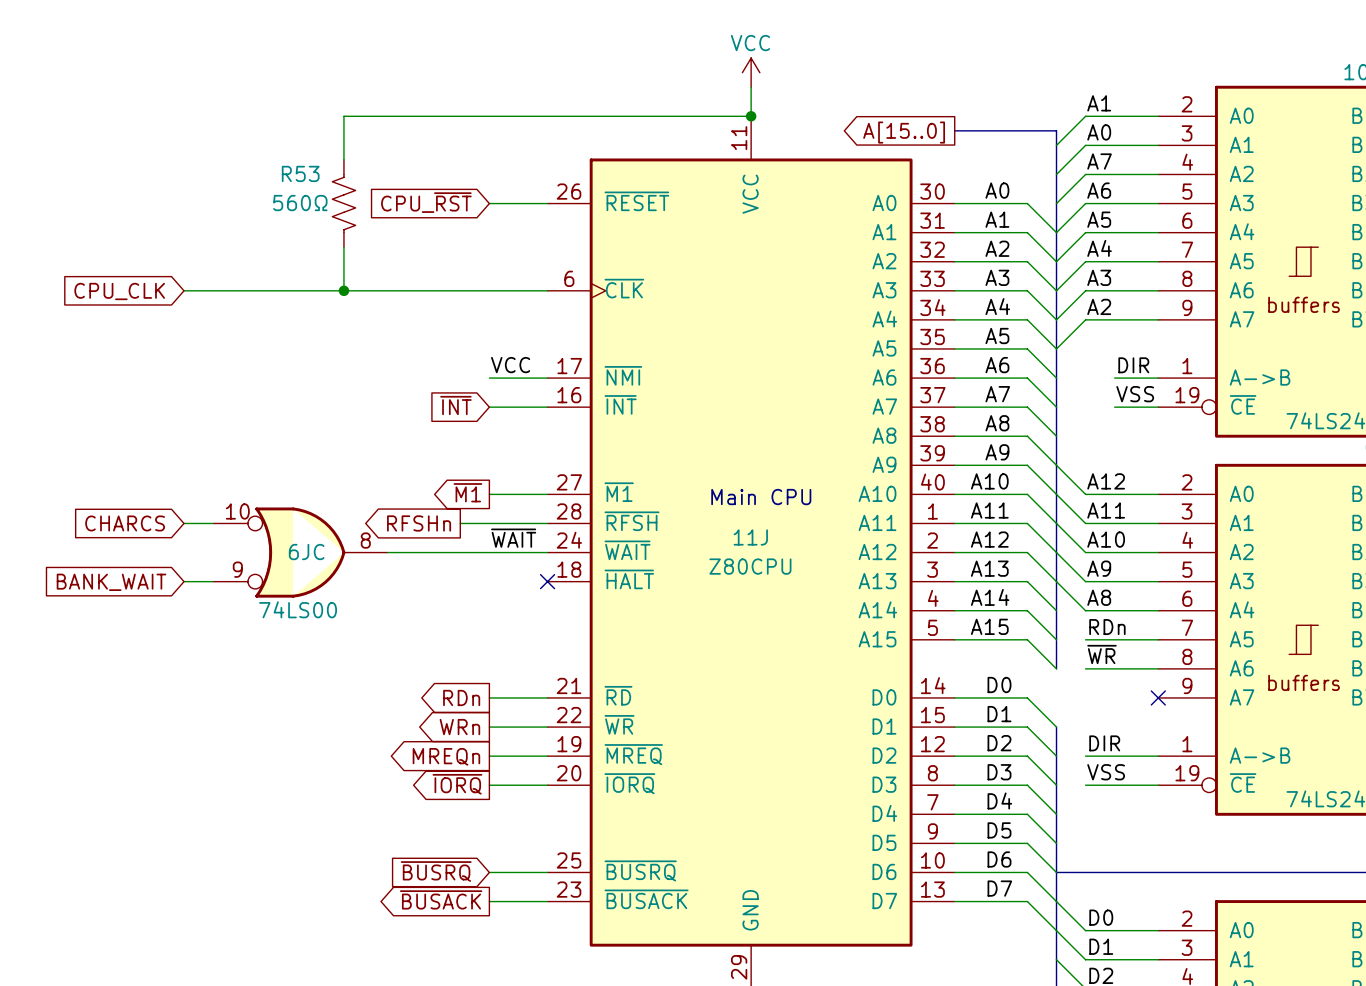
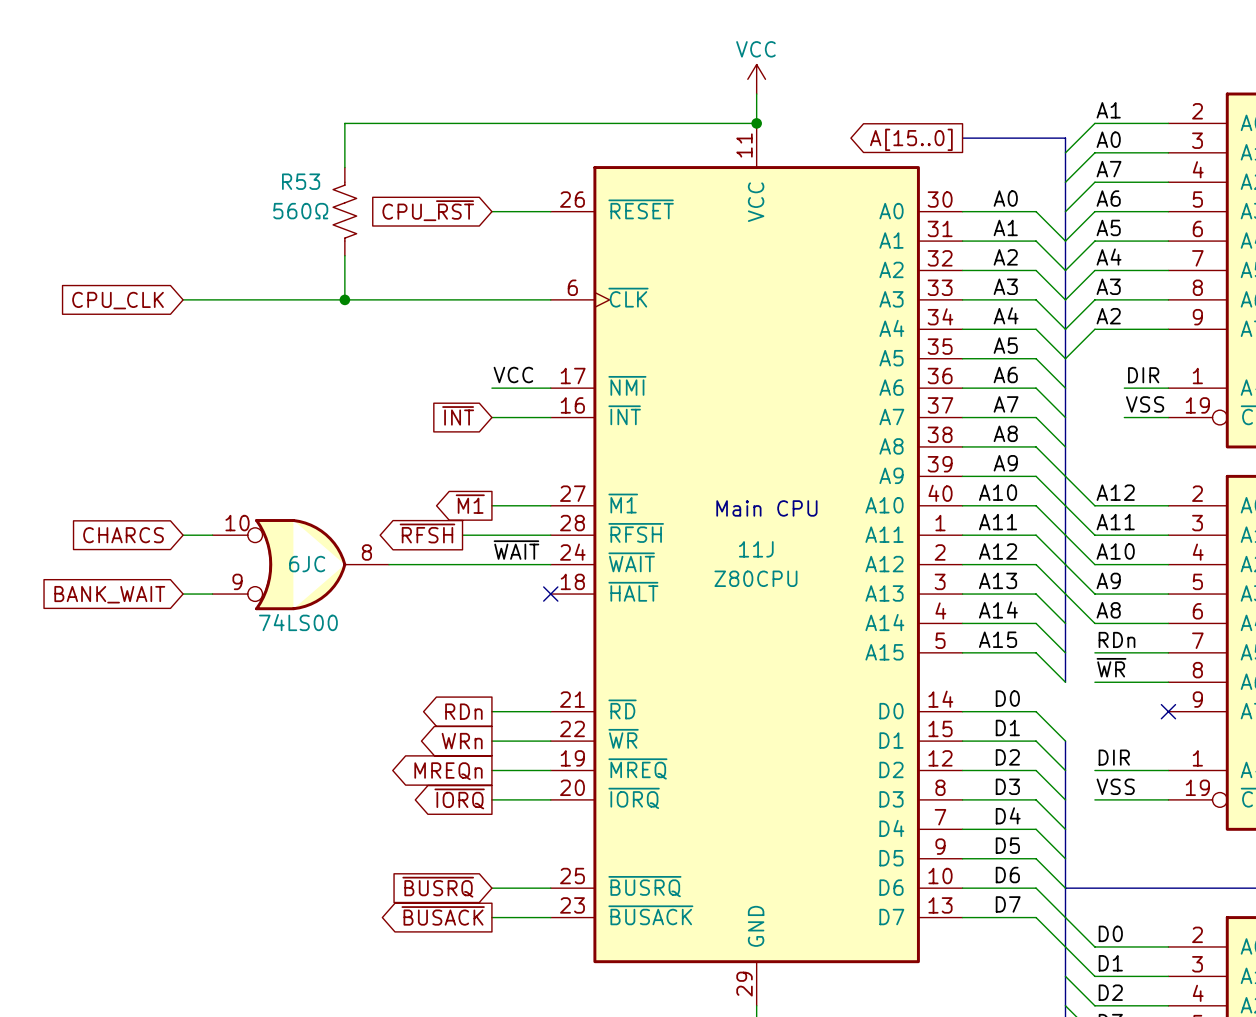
global label: RFSHn (419, 523) -> ~{RFSH} (427, 533)

